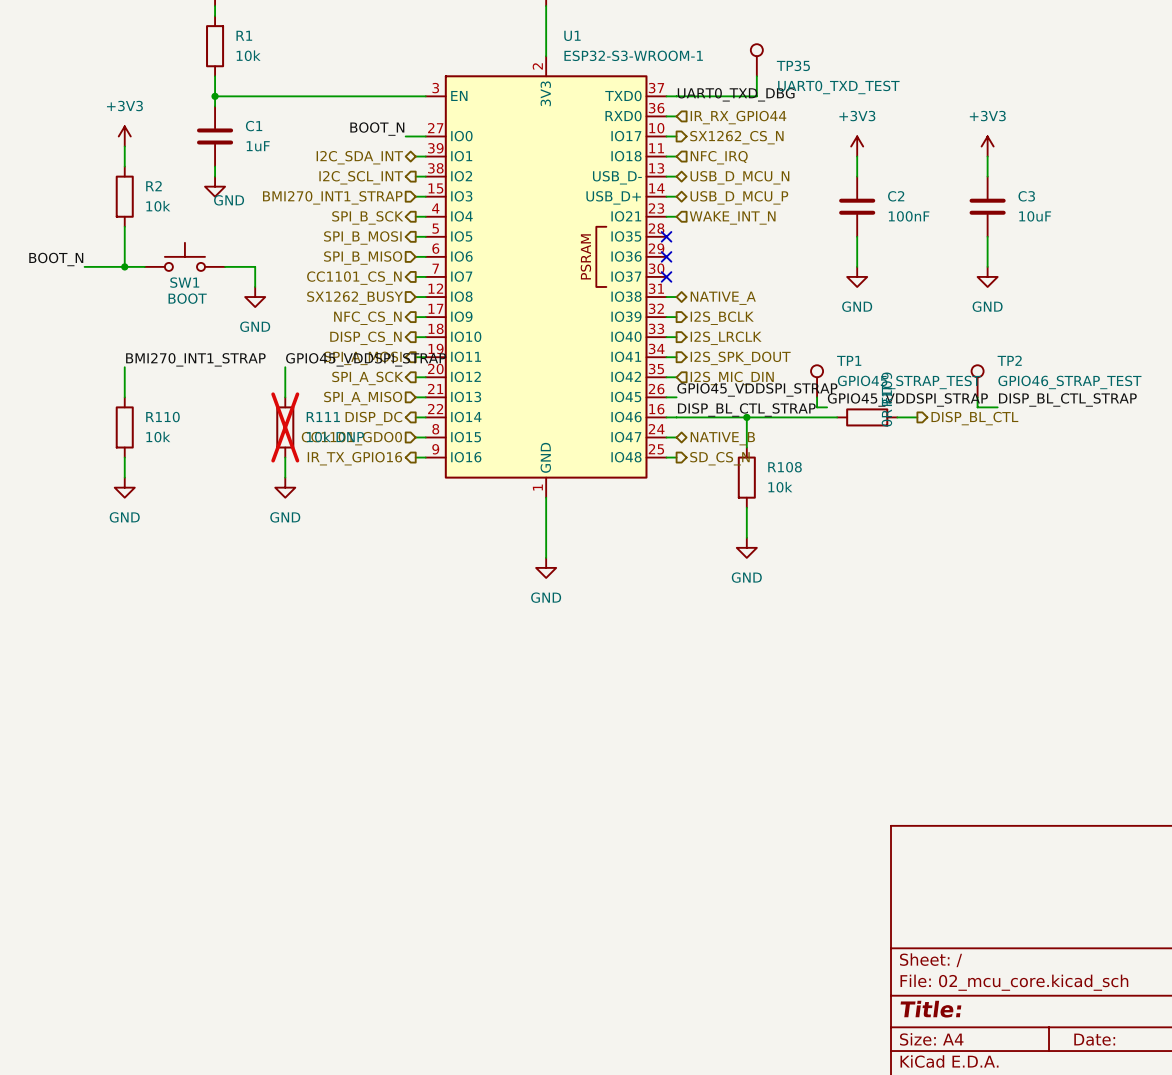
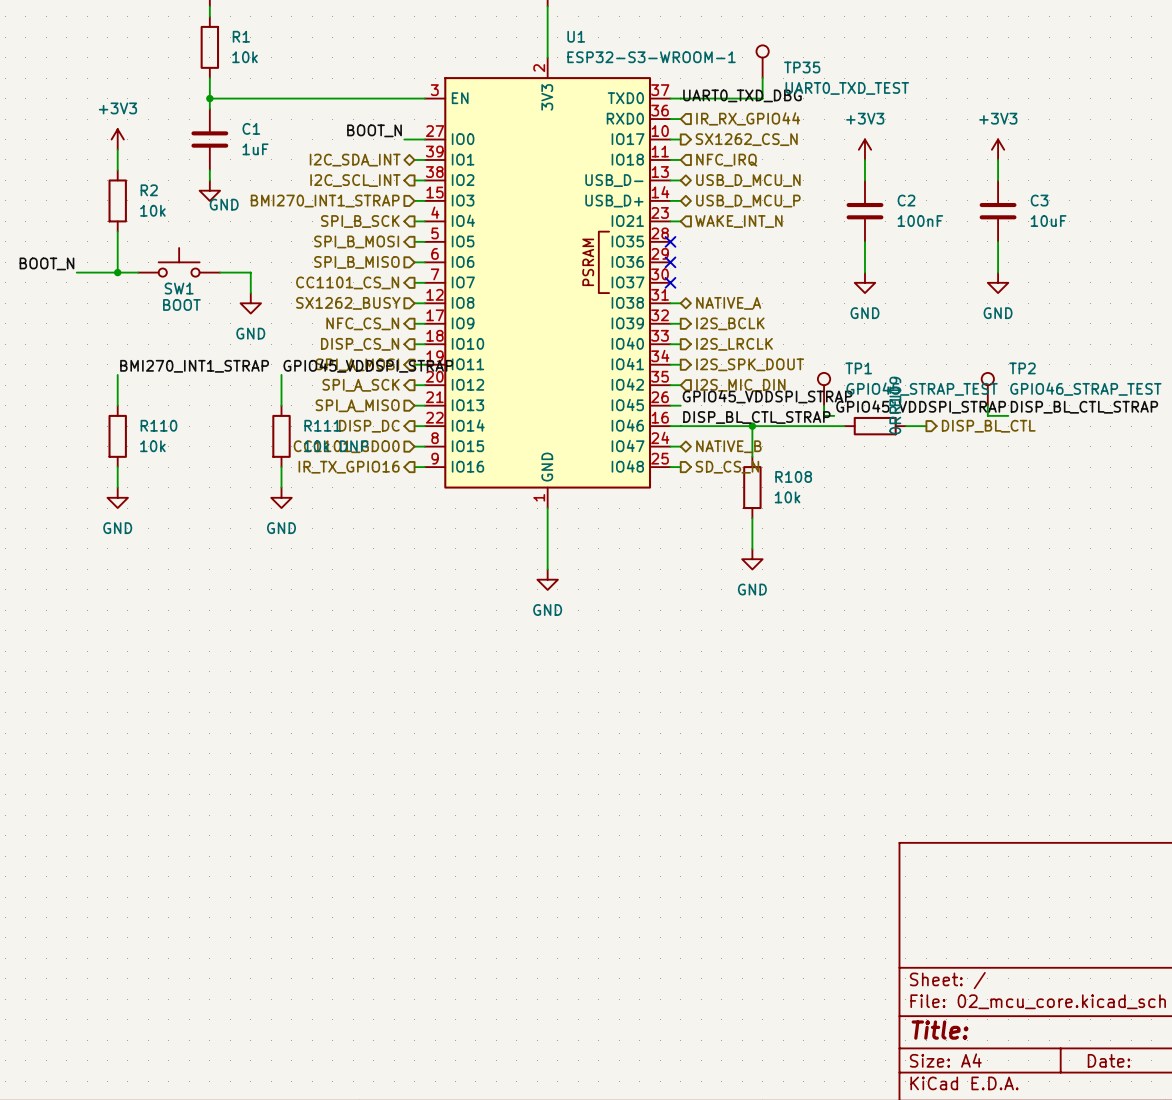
R111 do-not-place cross: (285, 427) -> none

